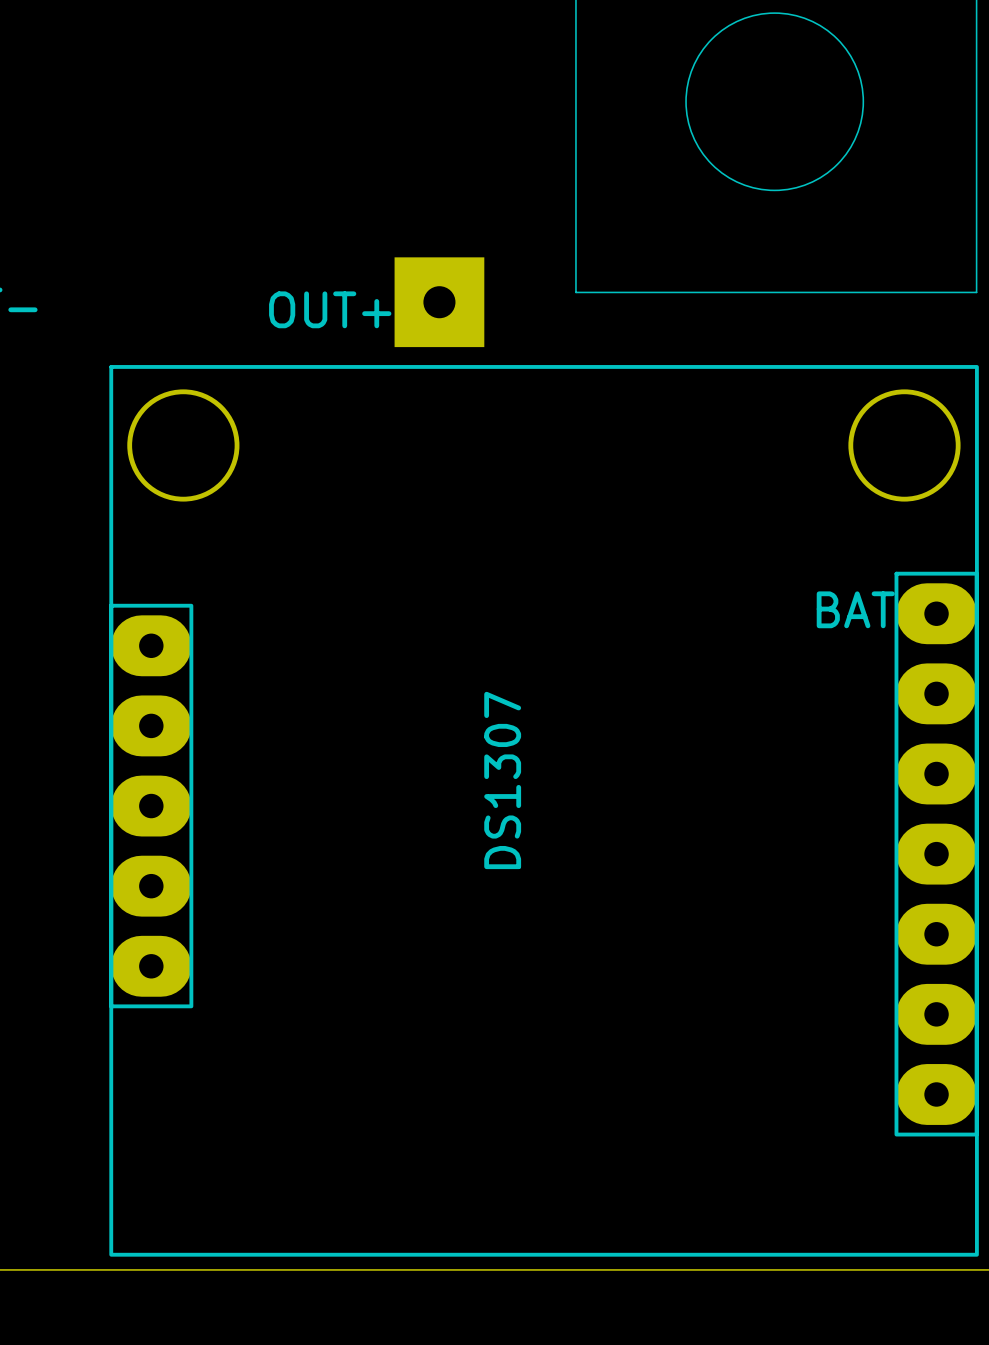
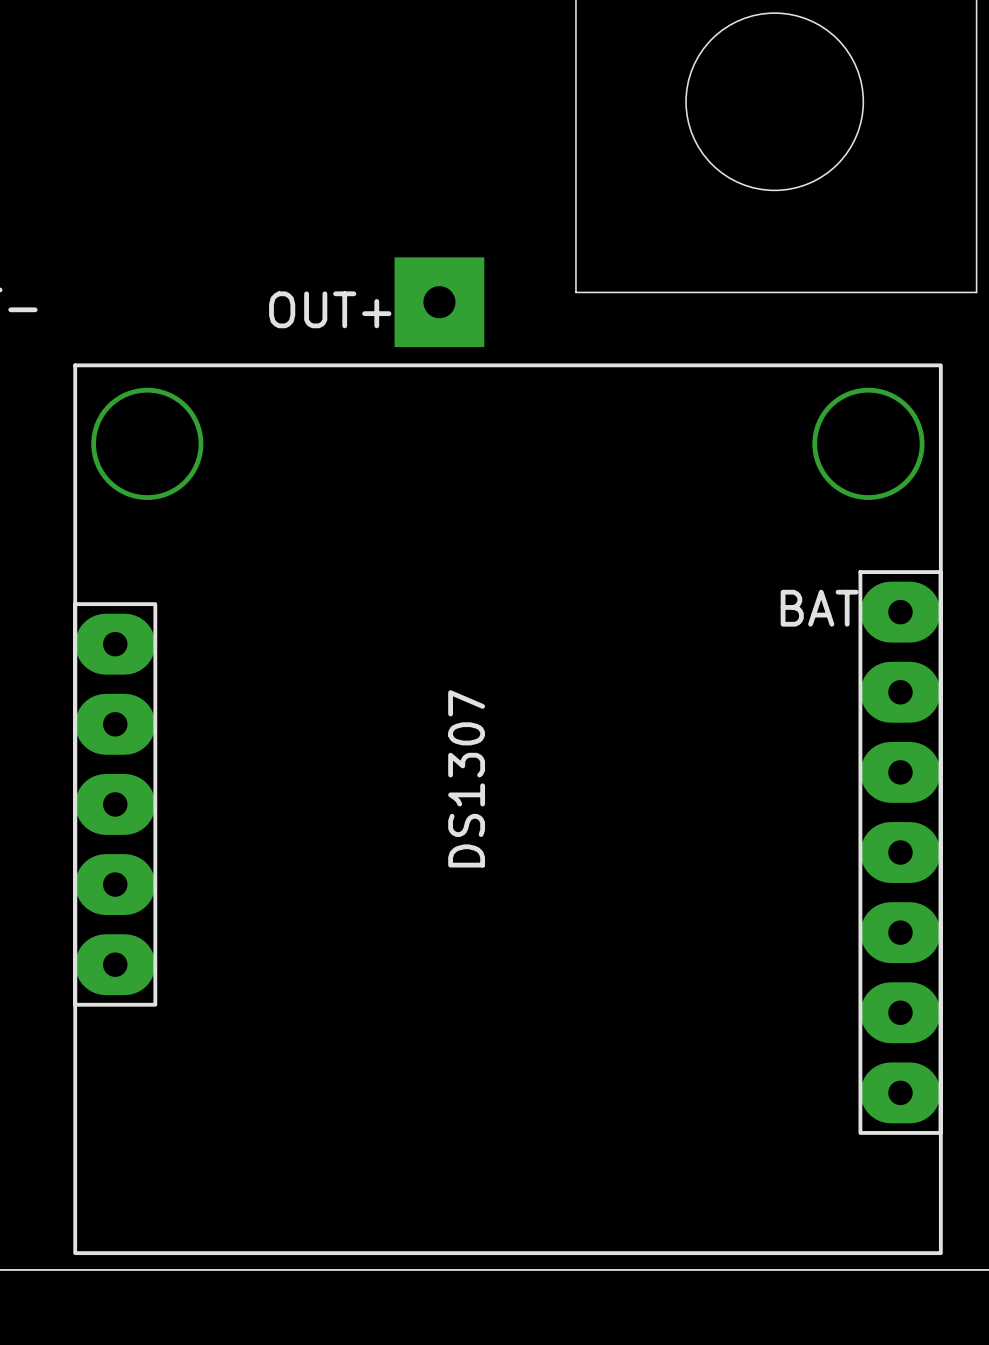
DS1307 position: (544, 810) -> (508, 809)

